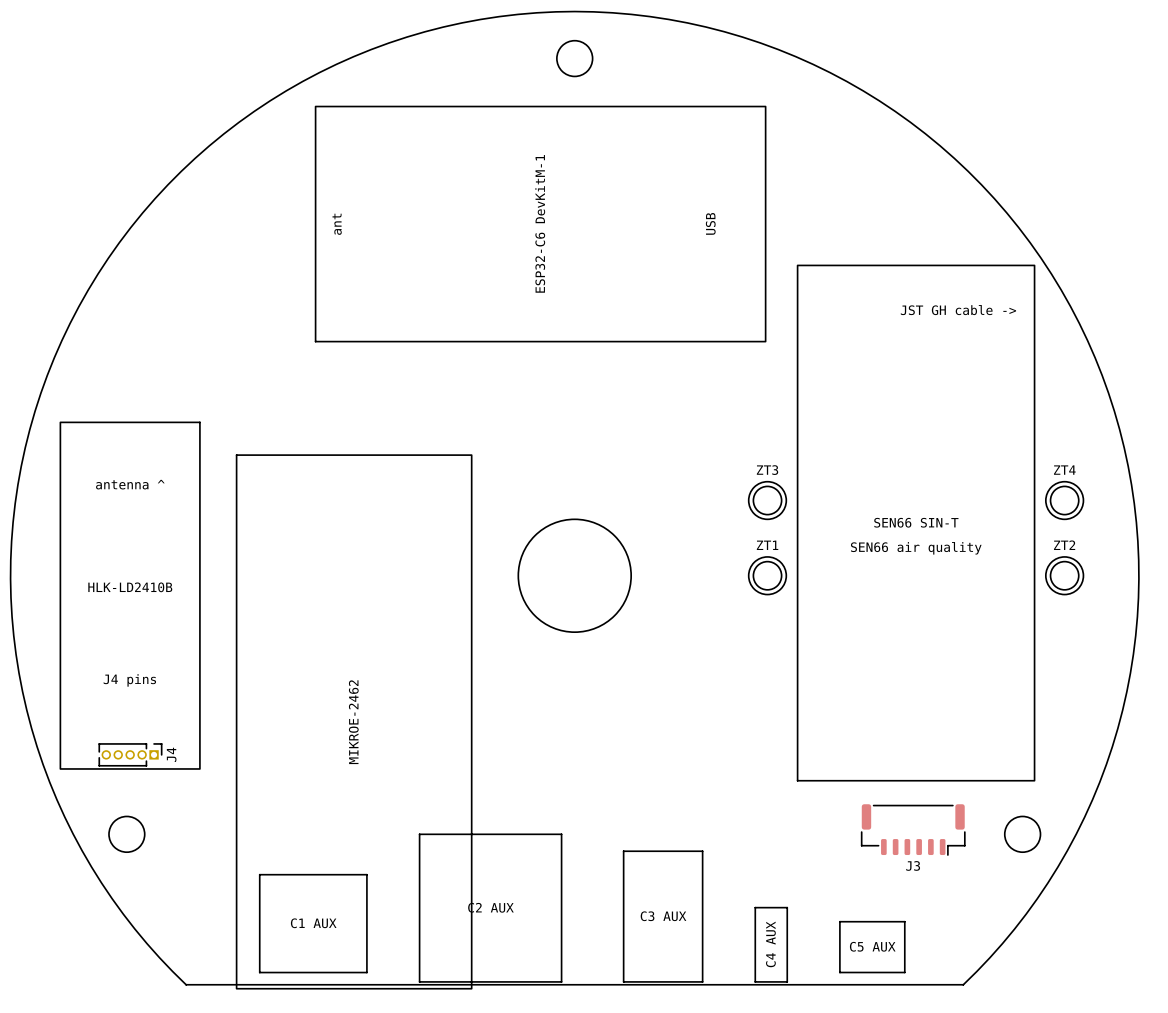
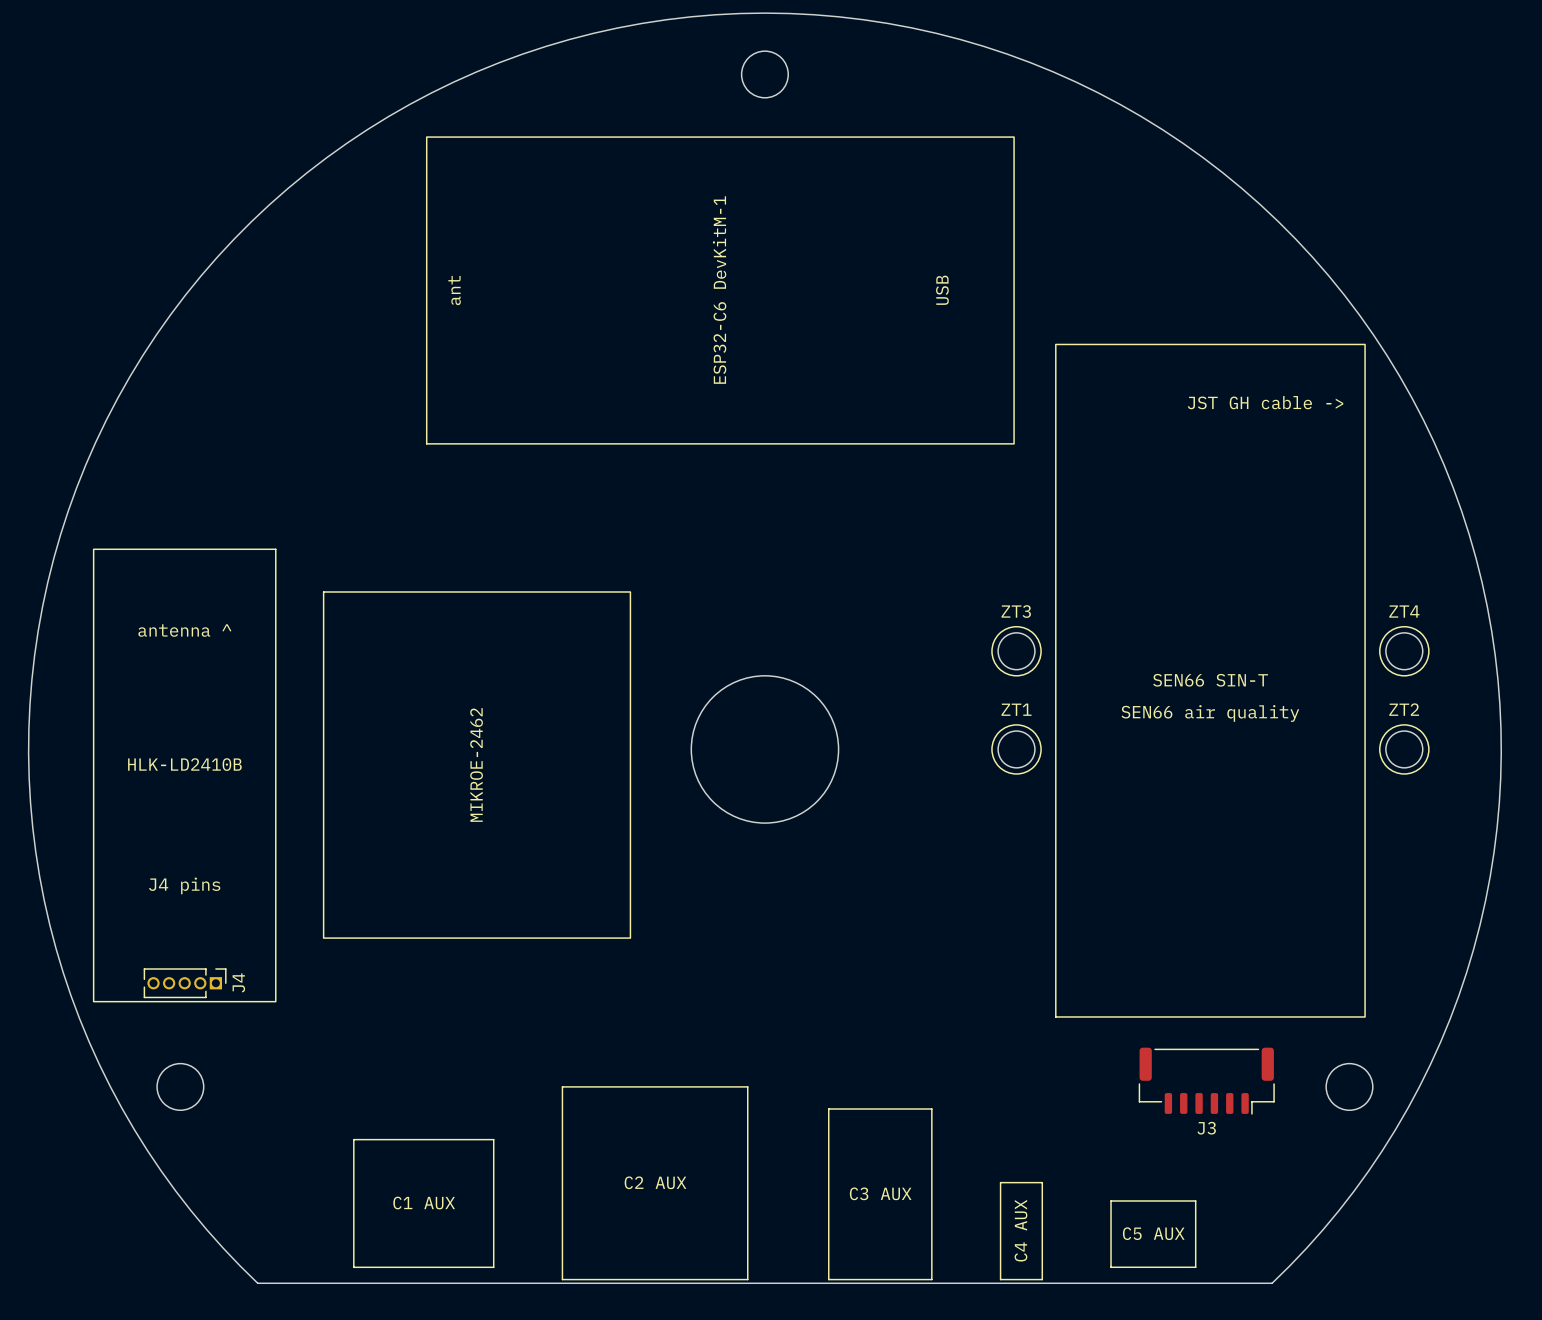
drawing: [236, 454, 473, 990] -> none
drawing: none -> [322, 591, 632, 939]

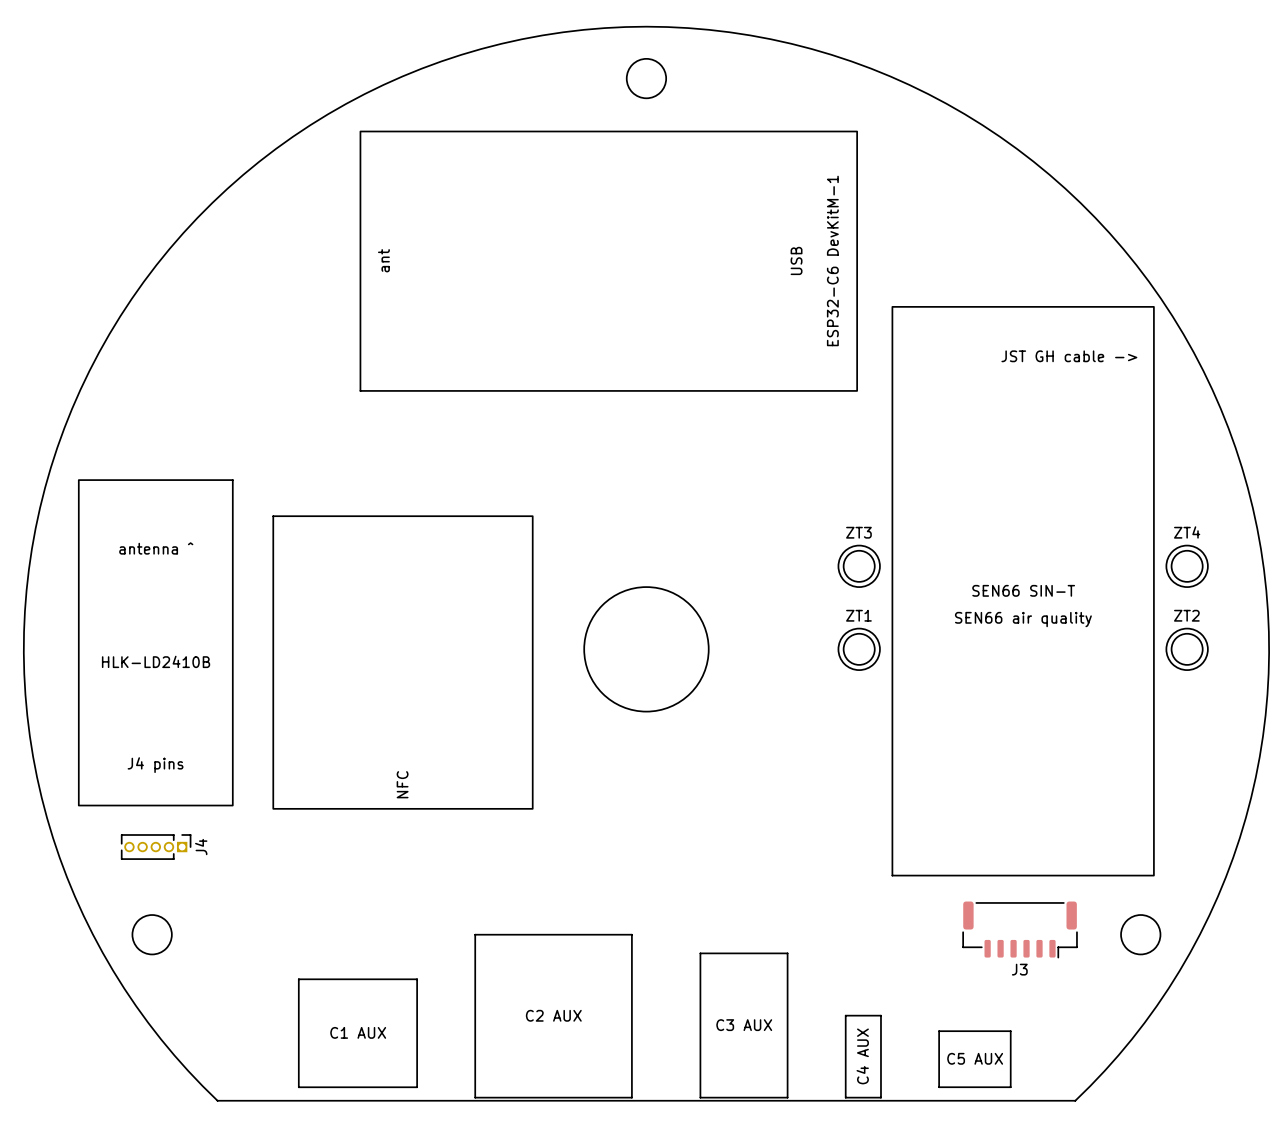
drawing shape: [425, 136, 1015, 445] -> [359, 130, 858, 392]
drawing: [92, 548, 277, 1003] -> none
drawing: none -> [78, 479, 234, 807]
drawing shape: [322, 591, 632, 939] -> [272, 515, 534, 810]

